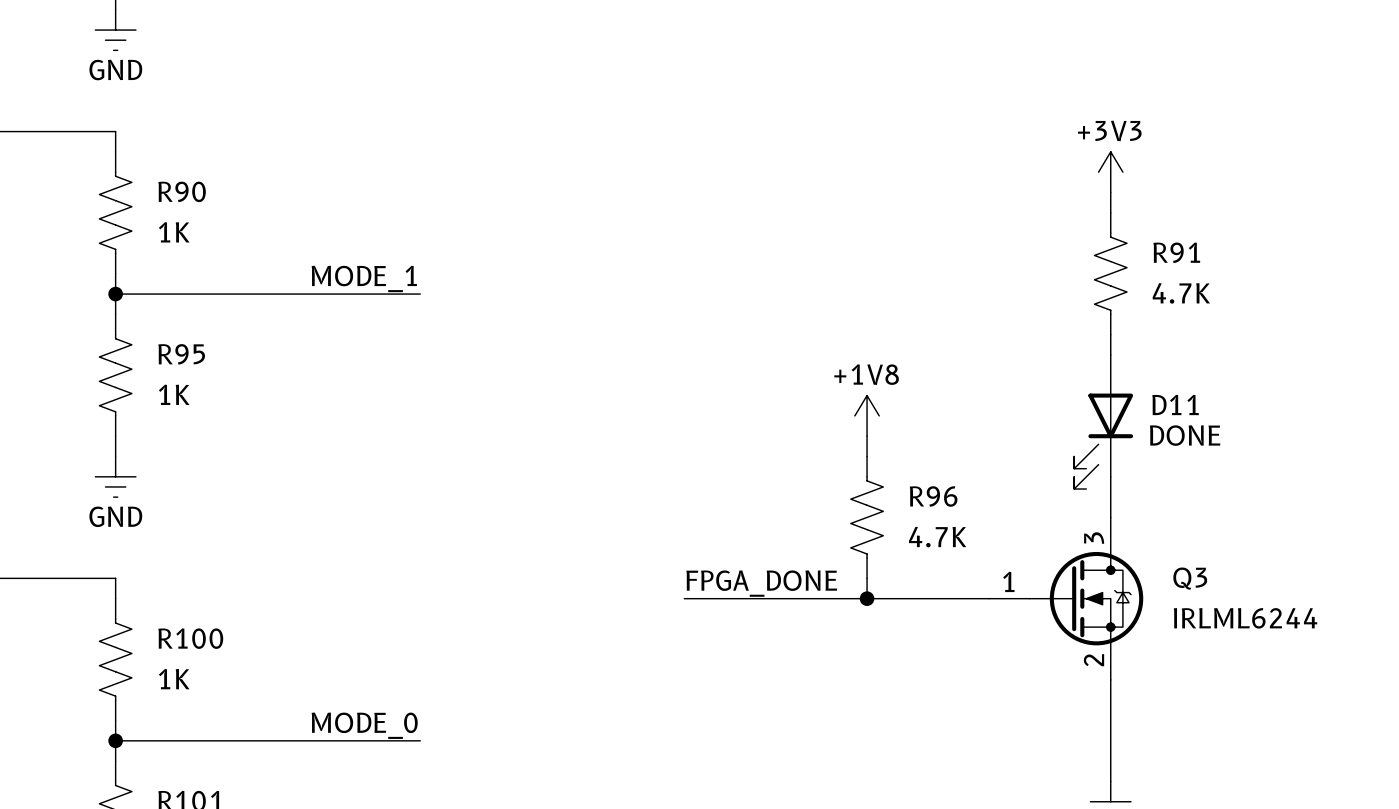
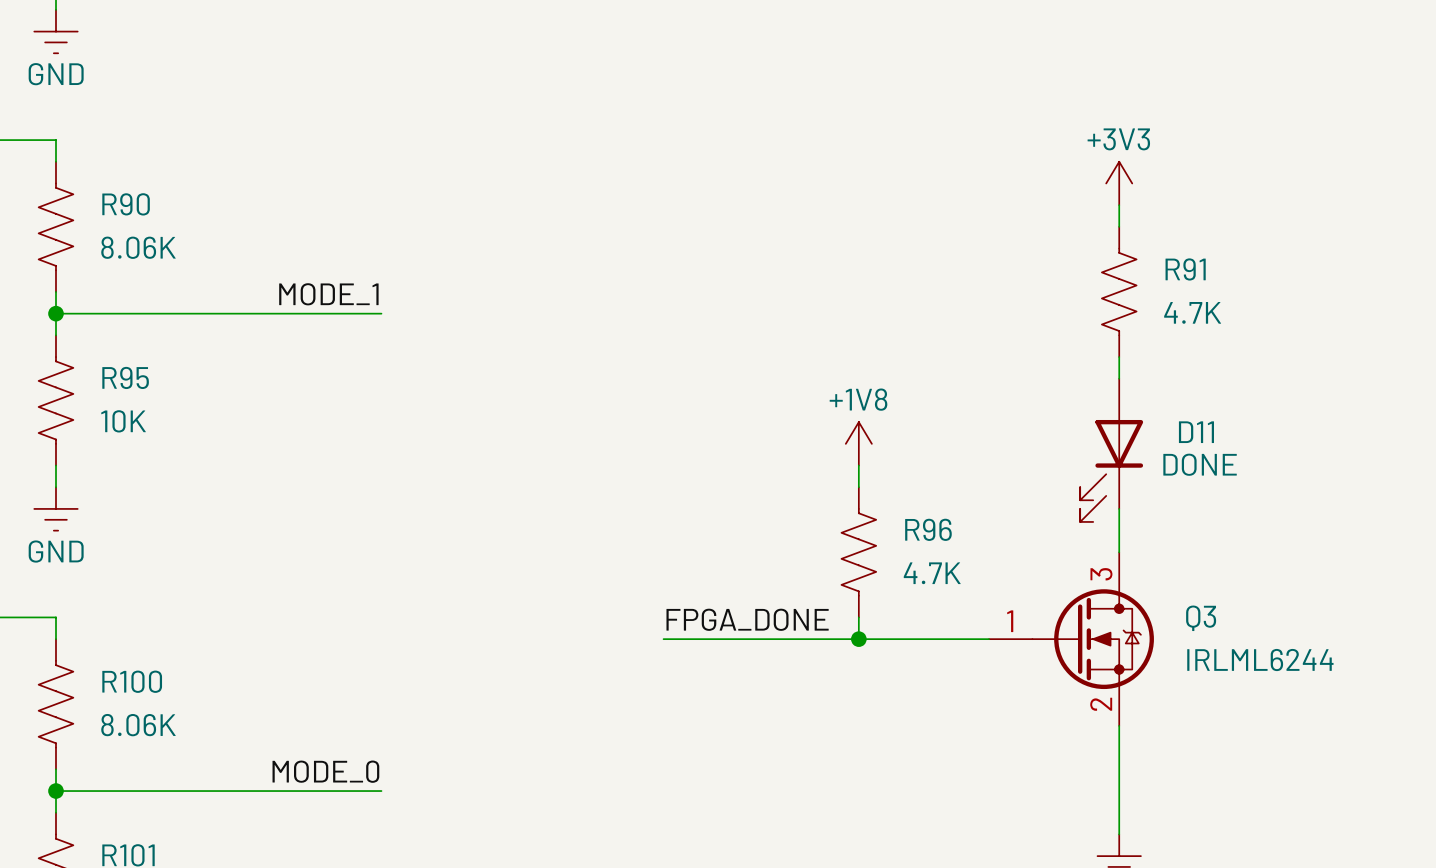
R90 value: 1K (174, 232) -> 8.06K (138, 247)
R95 value: 1K (174, 394) -> 10K (123, 421)
R100 value: 1K (174, 679) -> 8.06K (138, 725)

